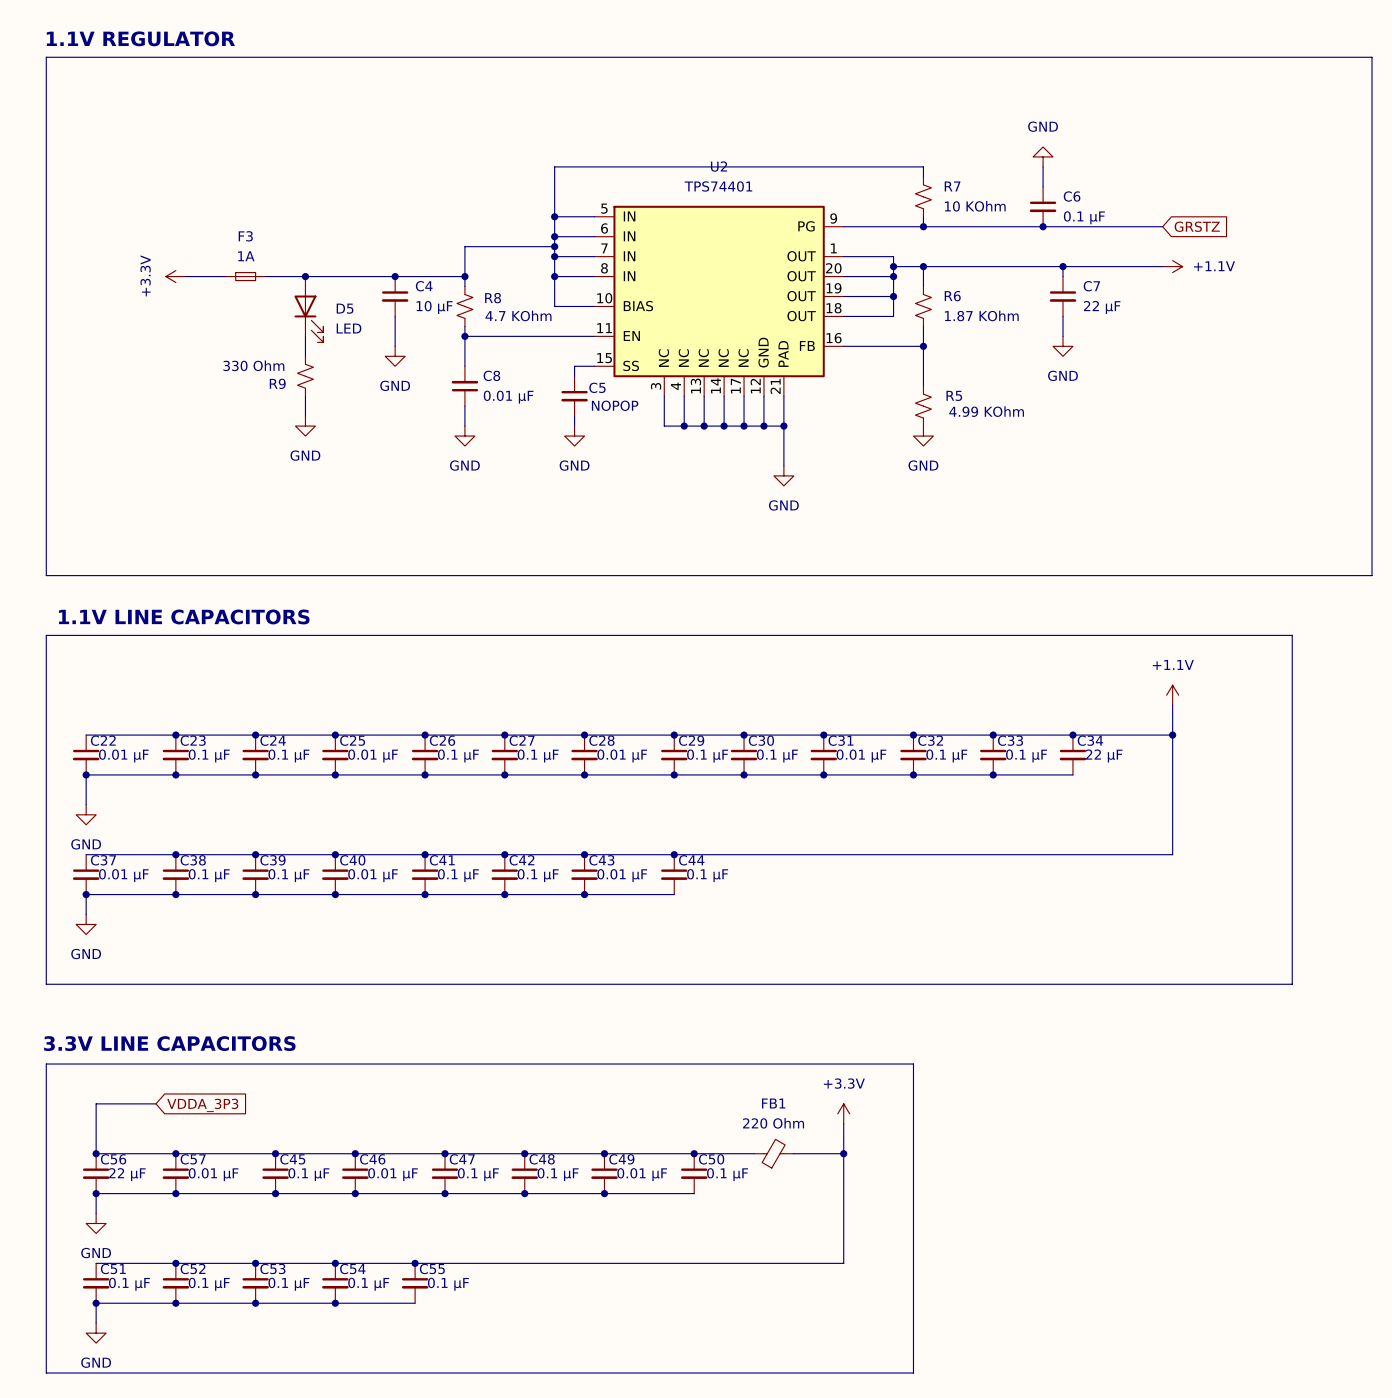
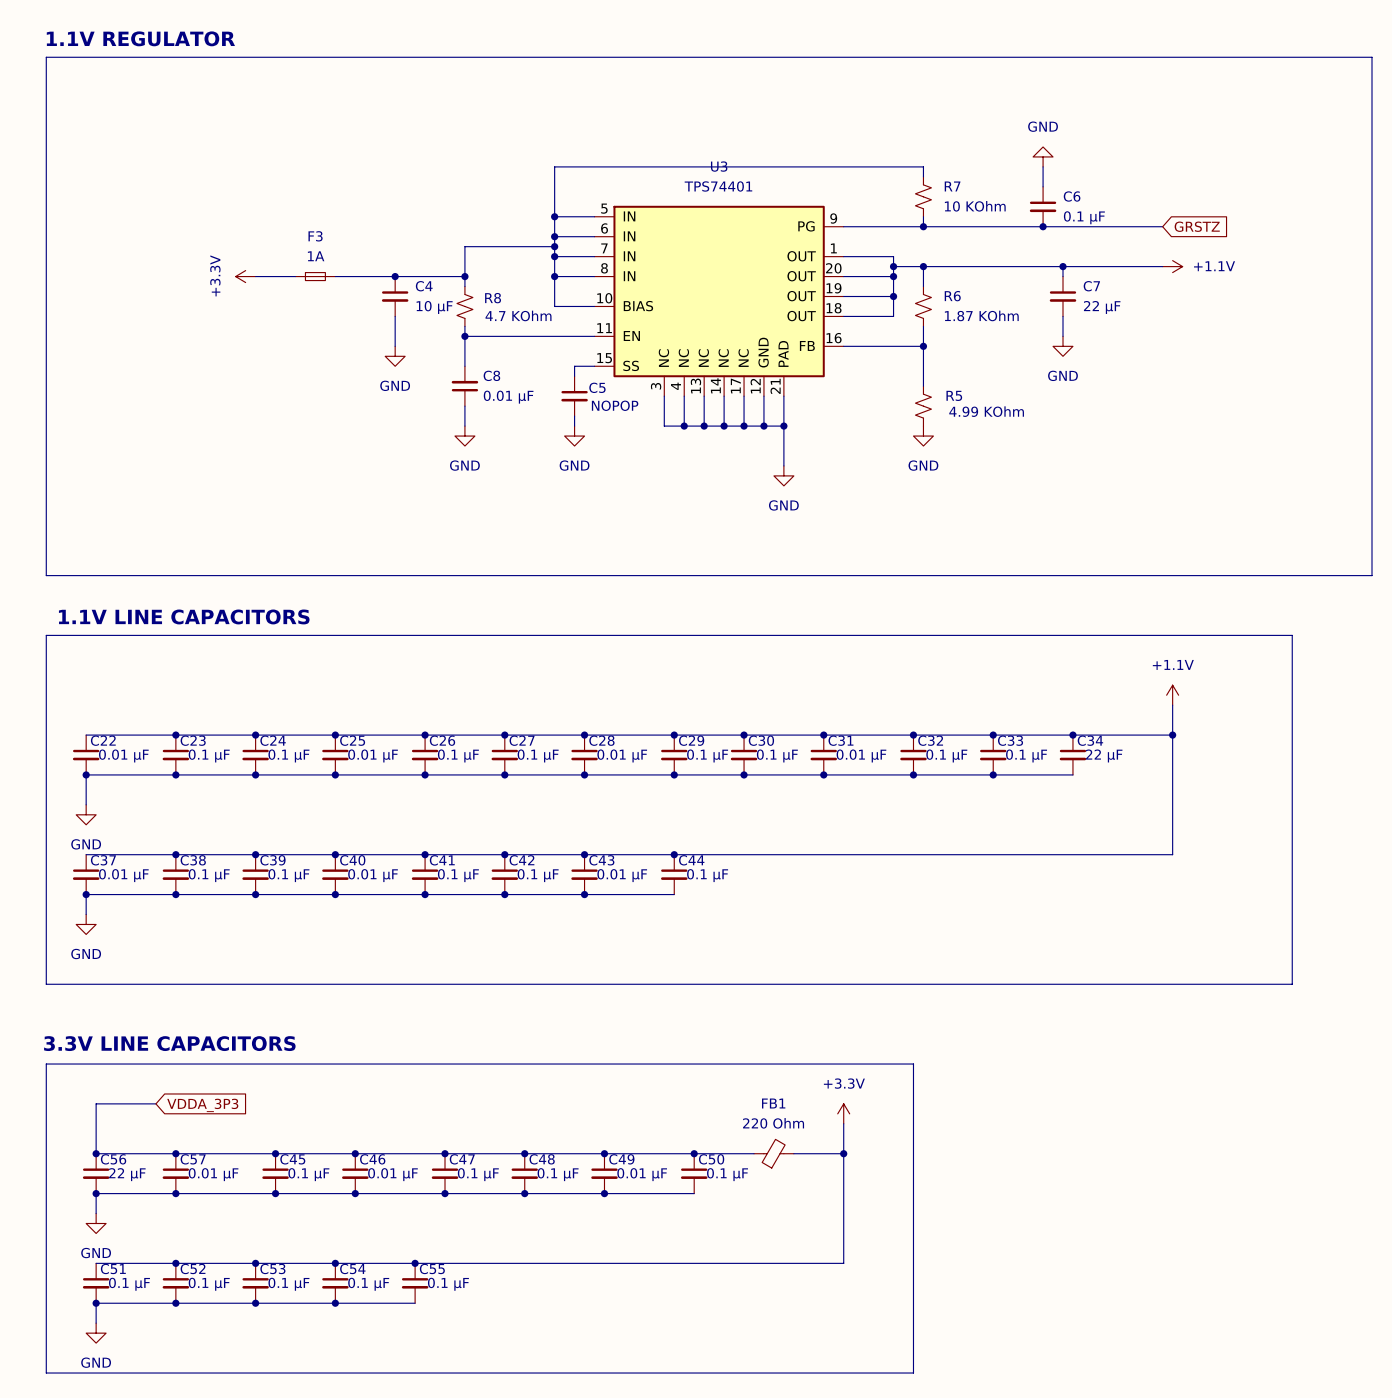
U2 name: U2 (719, 166) -> U3 (719, 166)
power symbol position: +3.3V (175, 276) -> +3.3V (245, 276)
wire: (185, 276) (225, 276) -> none
F3 position: (245, 276) -> (315, 276)
junction: (305, 276) -> none
D5: LED (308, 309) -> none
wire: (305, 336) (305, 356) -> none
R9: 330 Ohm (305, 376) -> none
wire: (305, 396) (305, 416) -> none
power symbol: GND (305, 426) -> none

